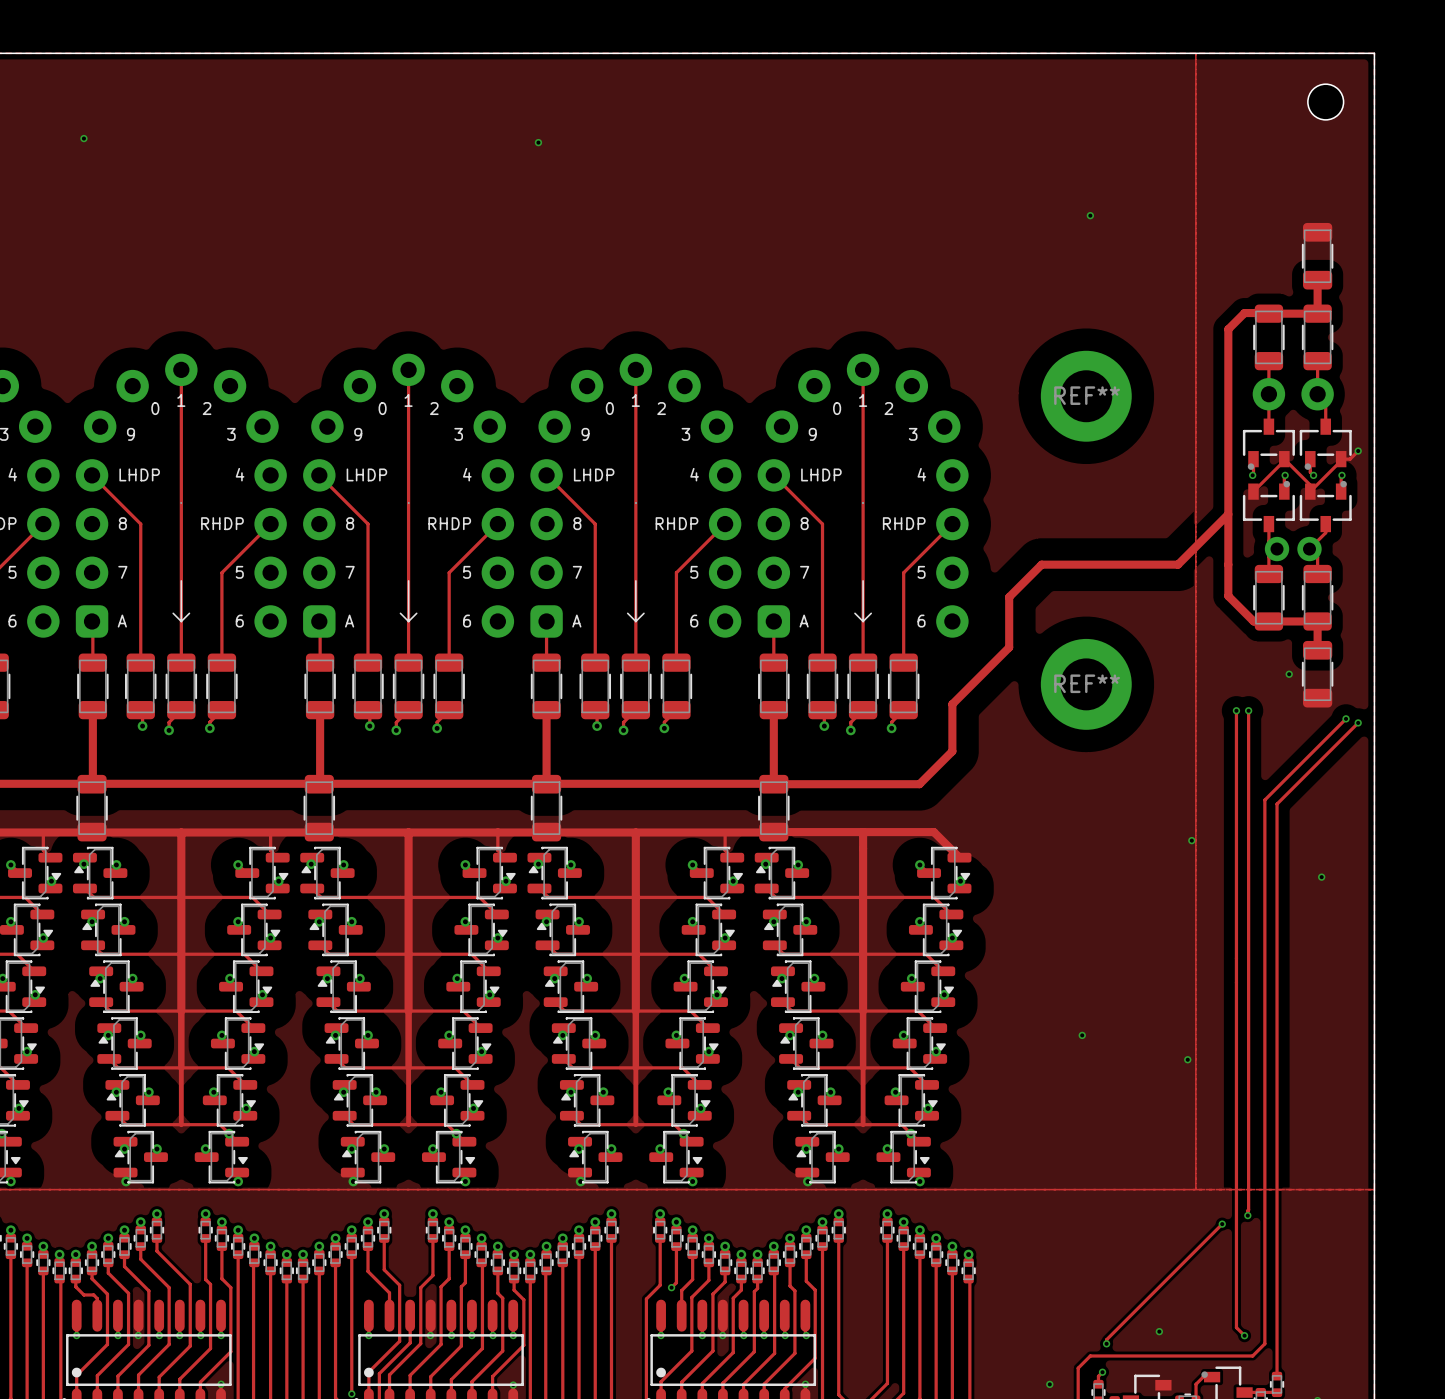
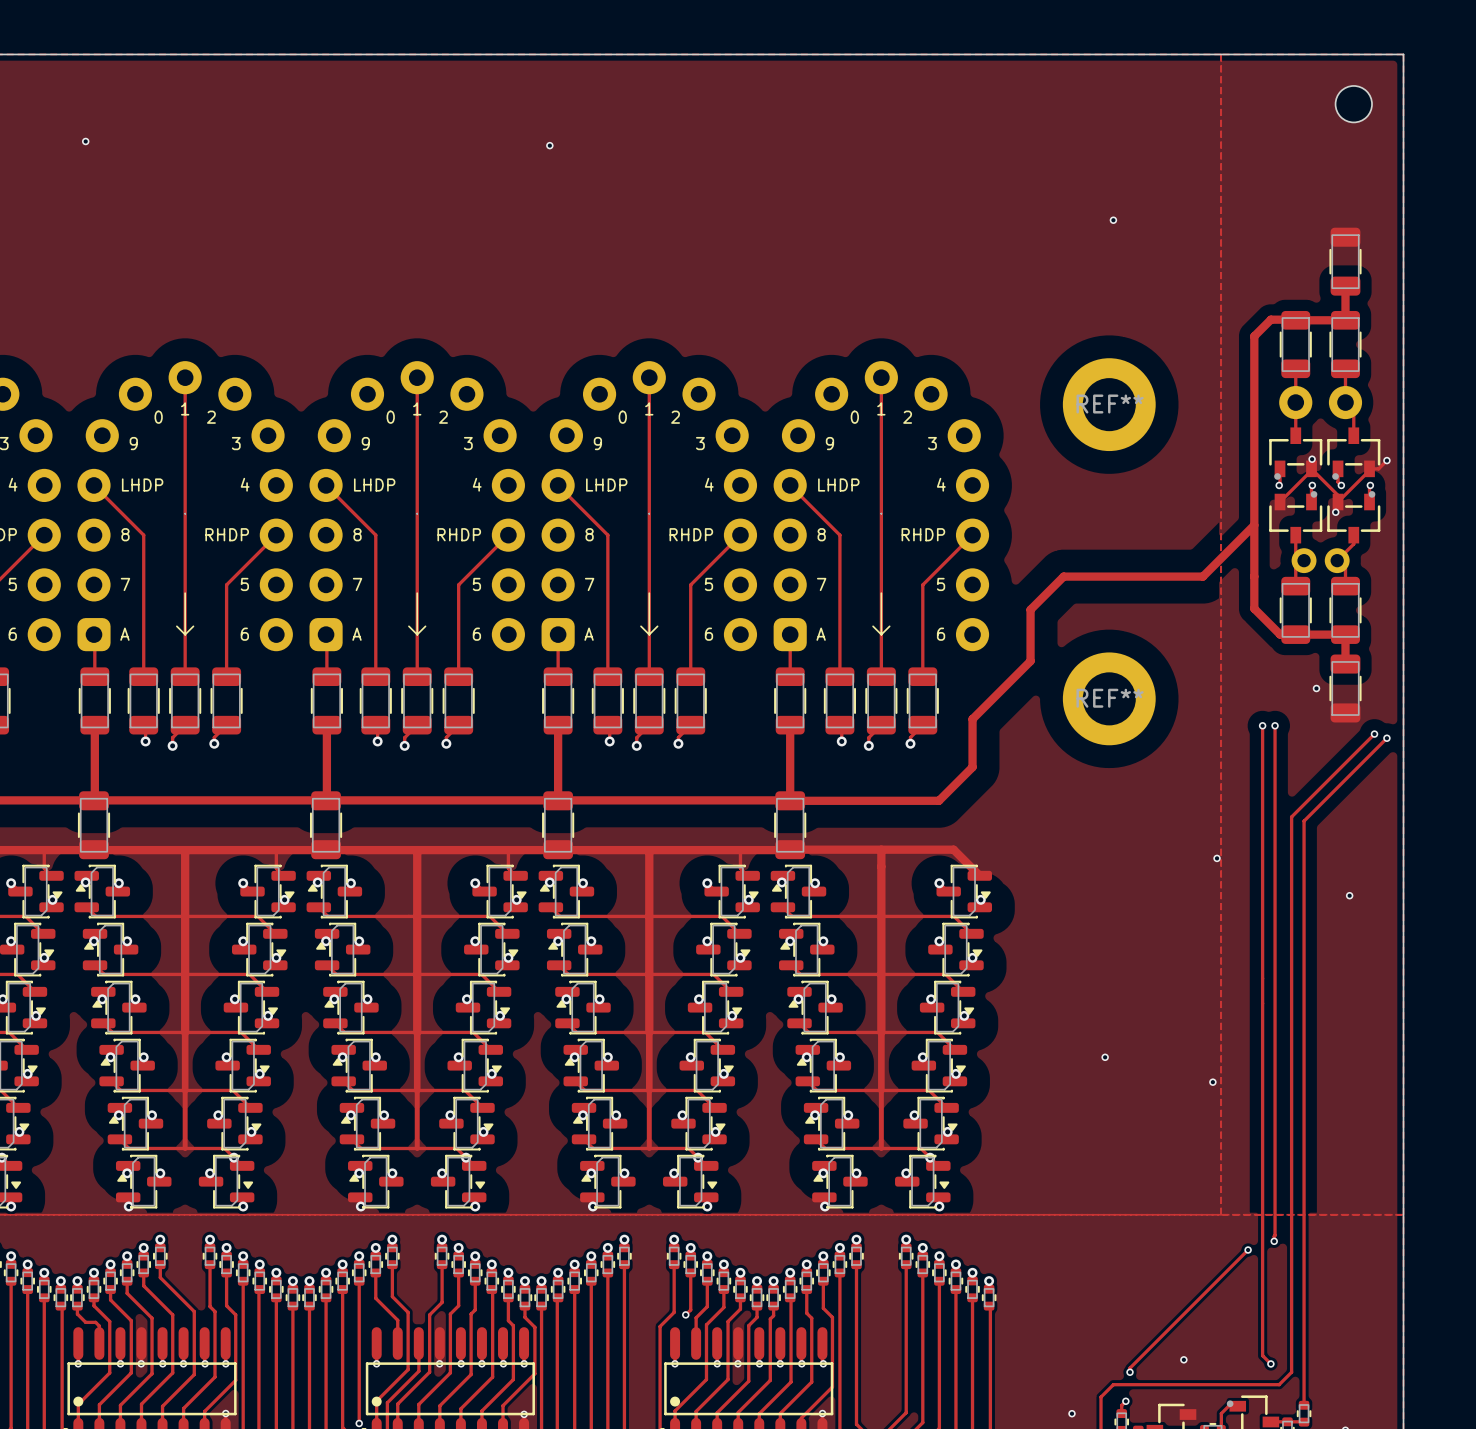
via: none -> (1312, 459)
via: none -> (1335, 512)

